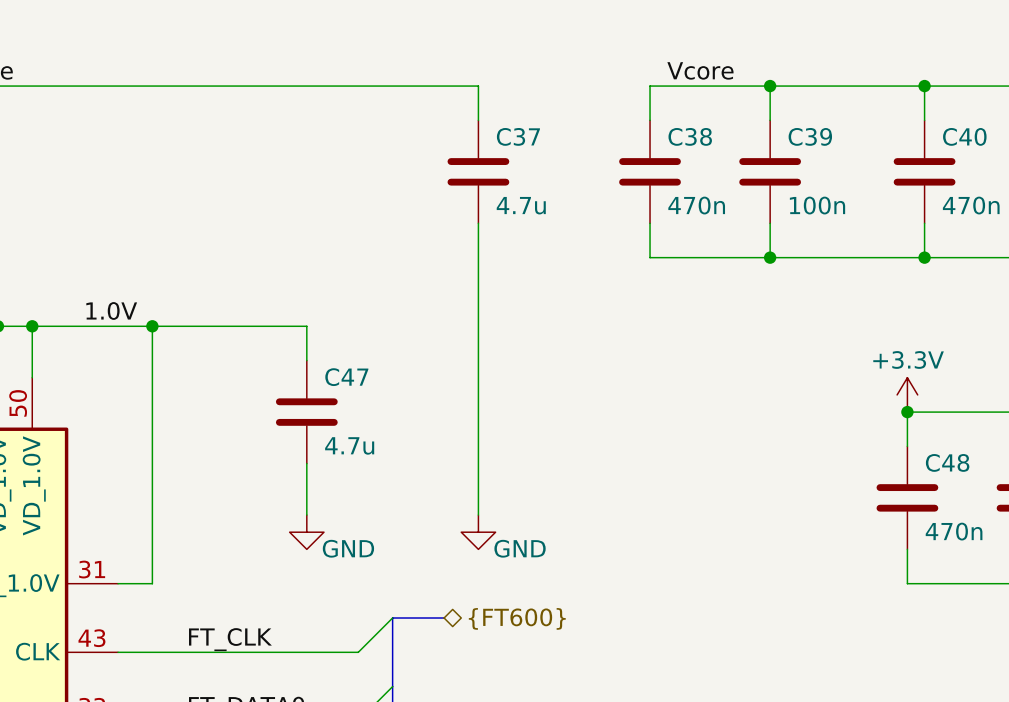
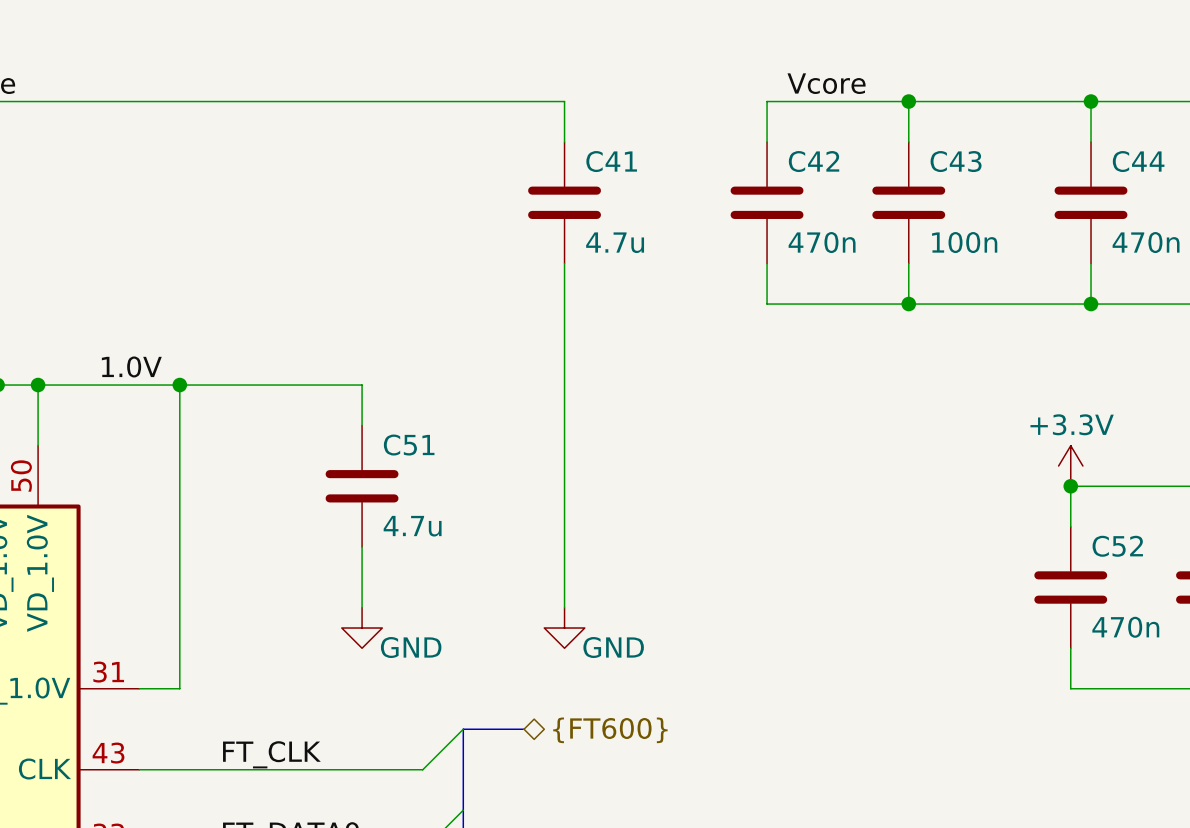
C37 name: C37 (518, 136) -> C41 (611, 161)
C38 name: C38 (690, 136) -> C42 (814, 161)
C39 name: C39 (810, 136) -> C43 (956, 161)
C40 name: C40 (964, 136) -> C44 (1138, 161)
C47 name: C47 (346, 377) -> C51 (409, 445)
C48 name: C48 (947, 462) -> C52 (1117, 546)

